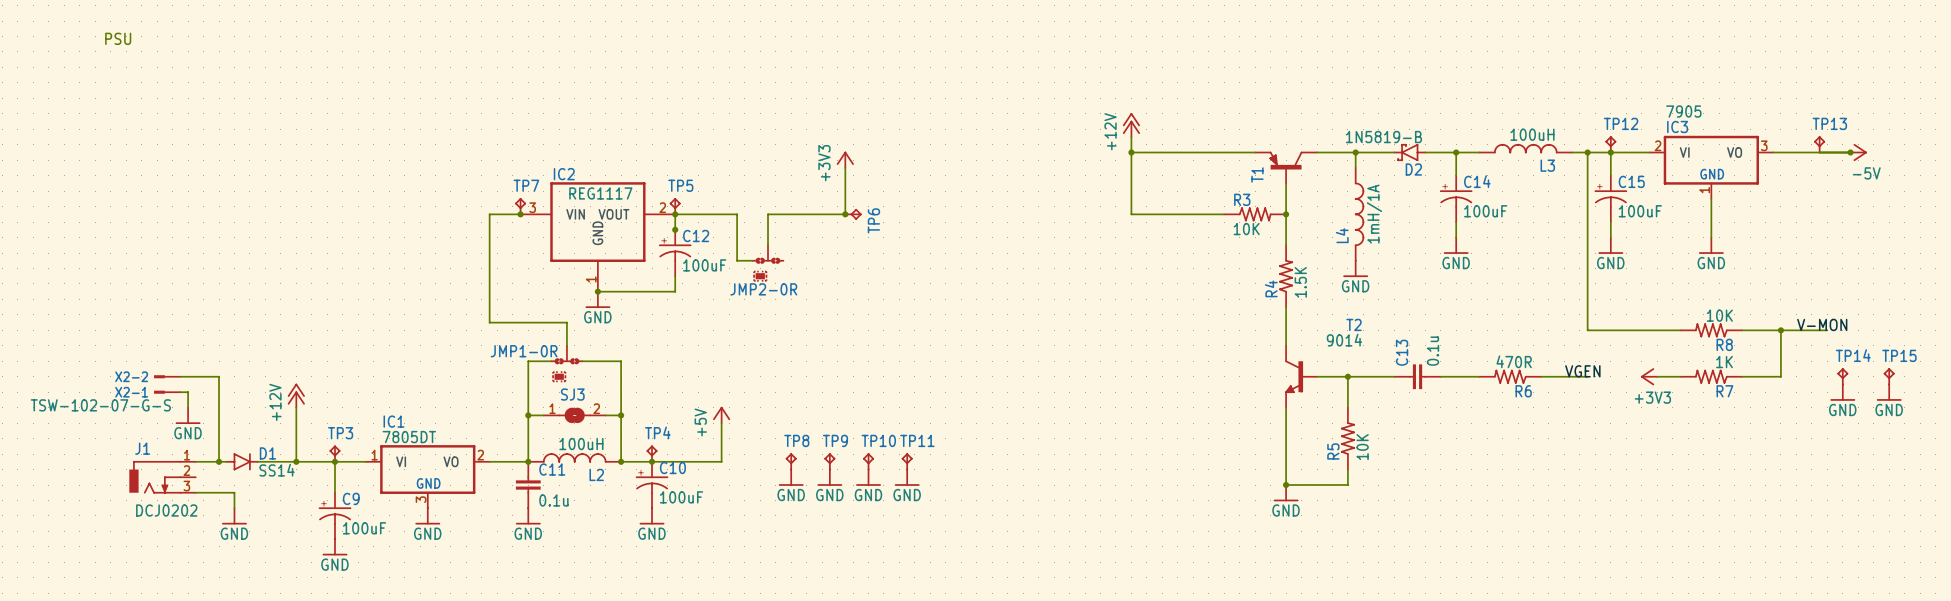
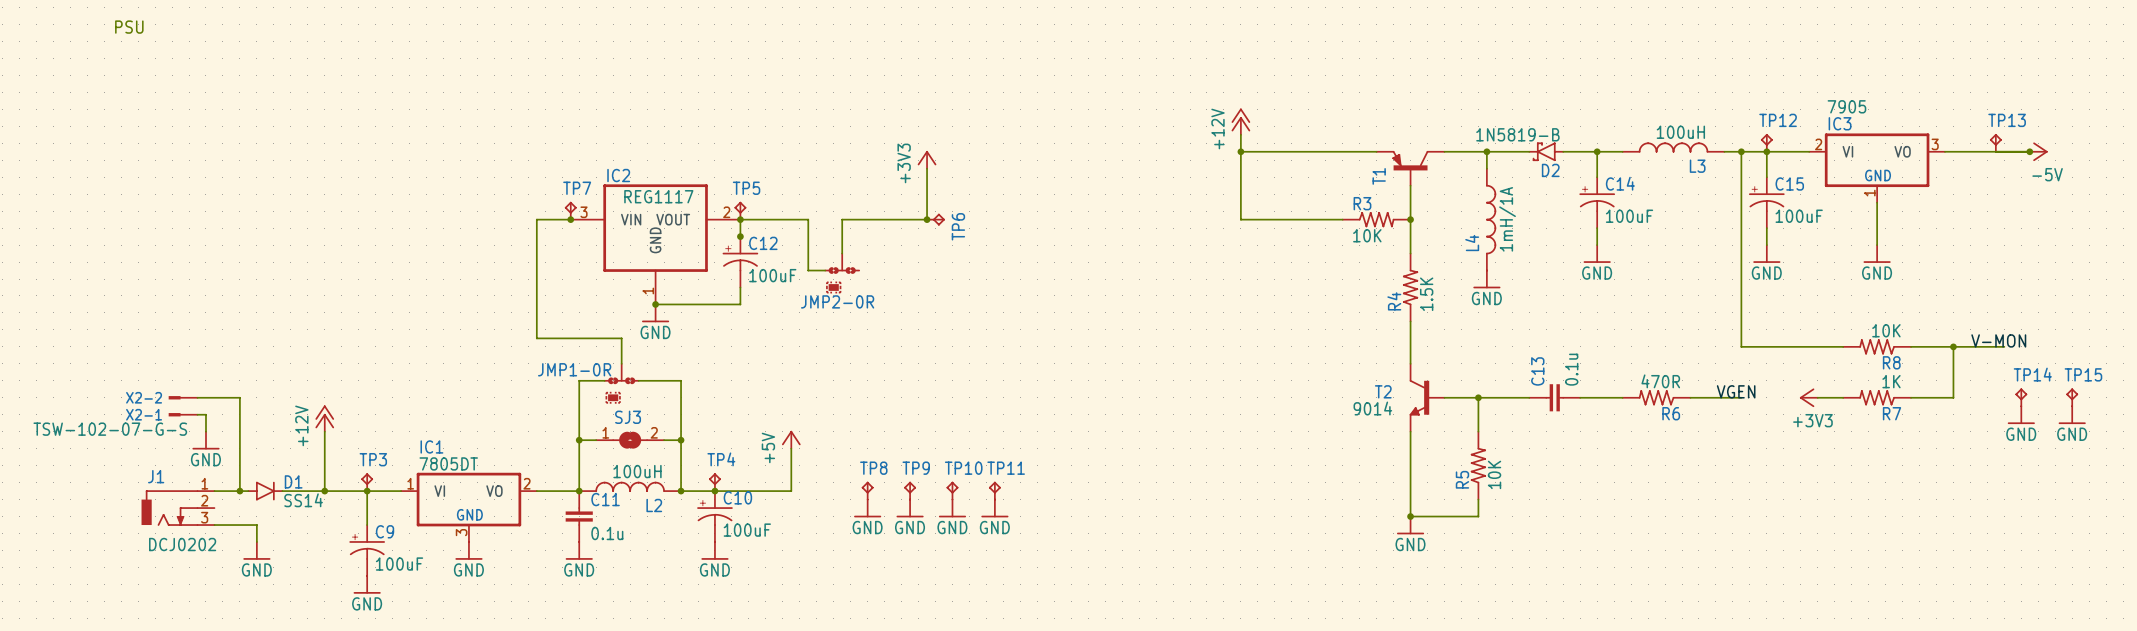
T2 name position: T2 (1354, 324) -> T2 (1383, 391)
T2 value position: 9014 (1344, 340) -> 9014 (1372, 408)

